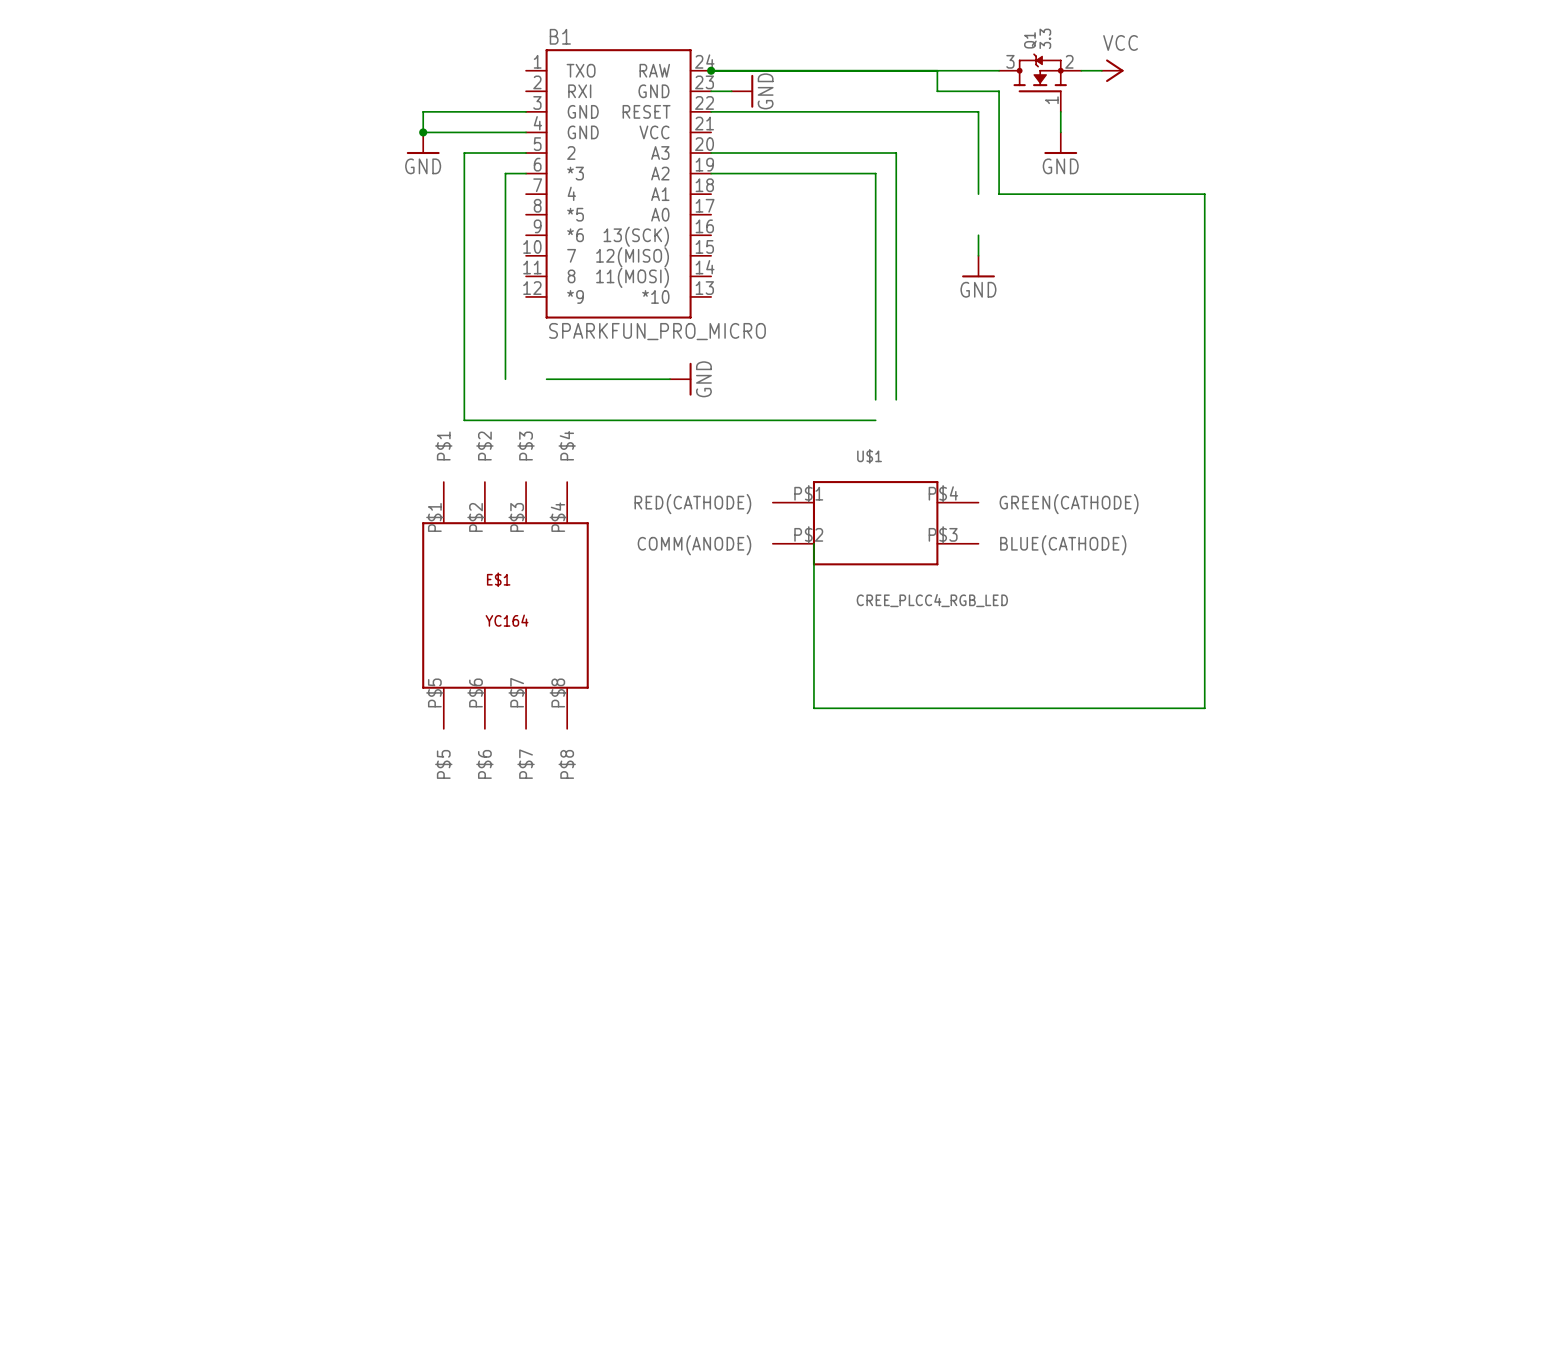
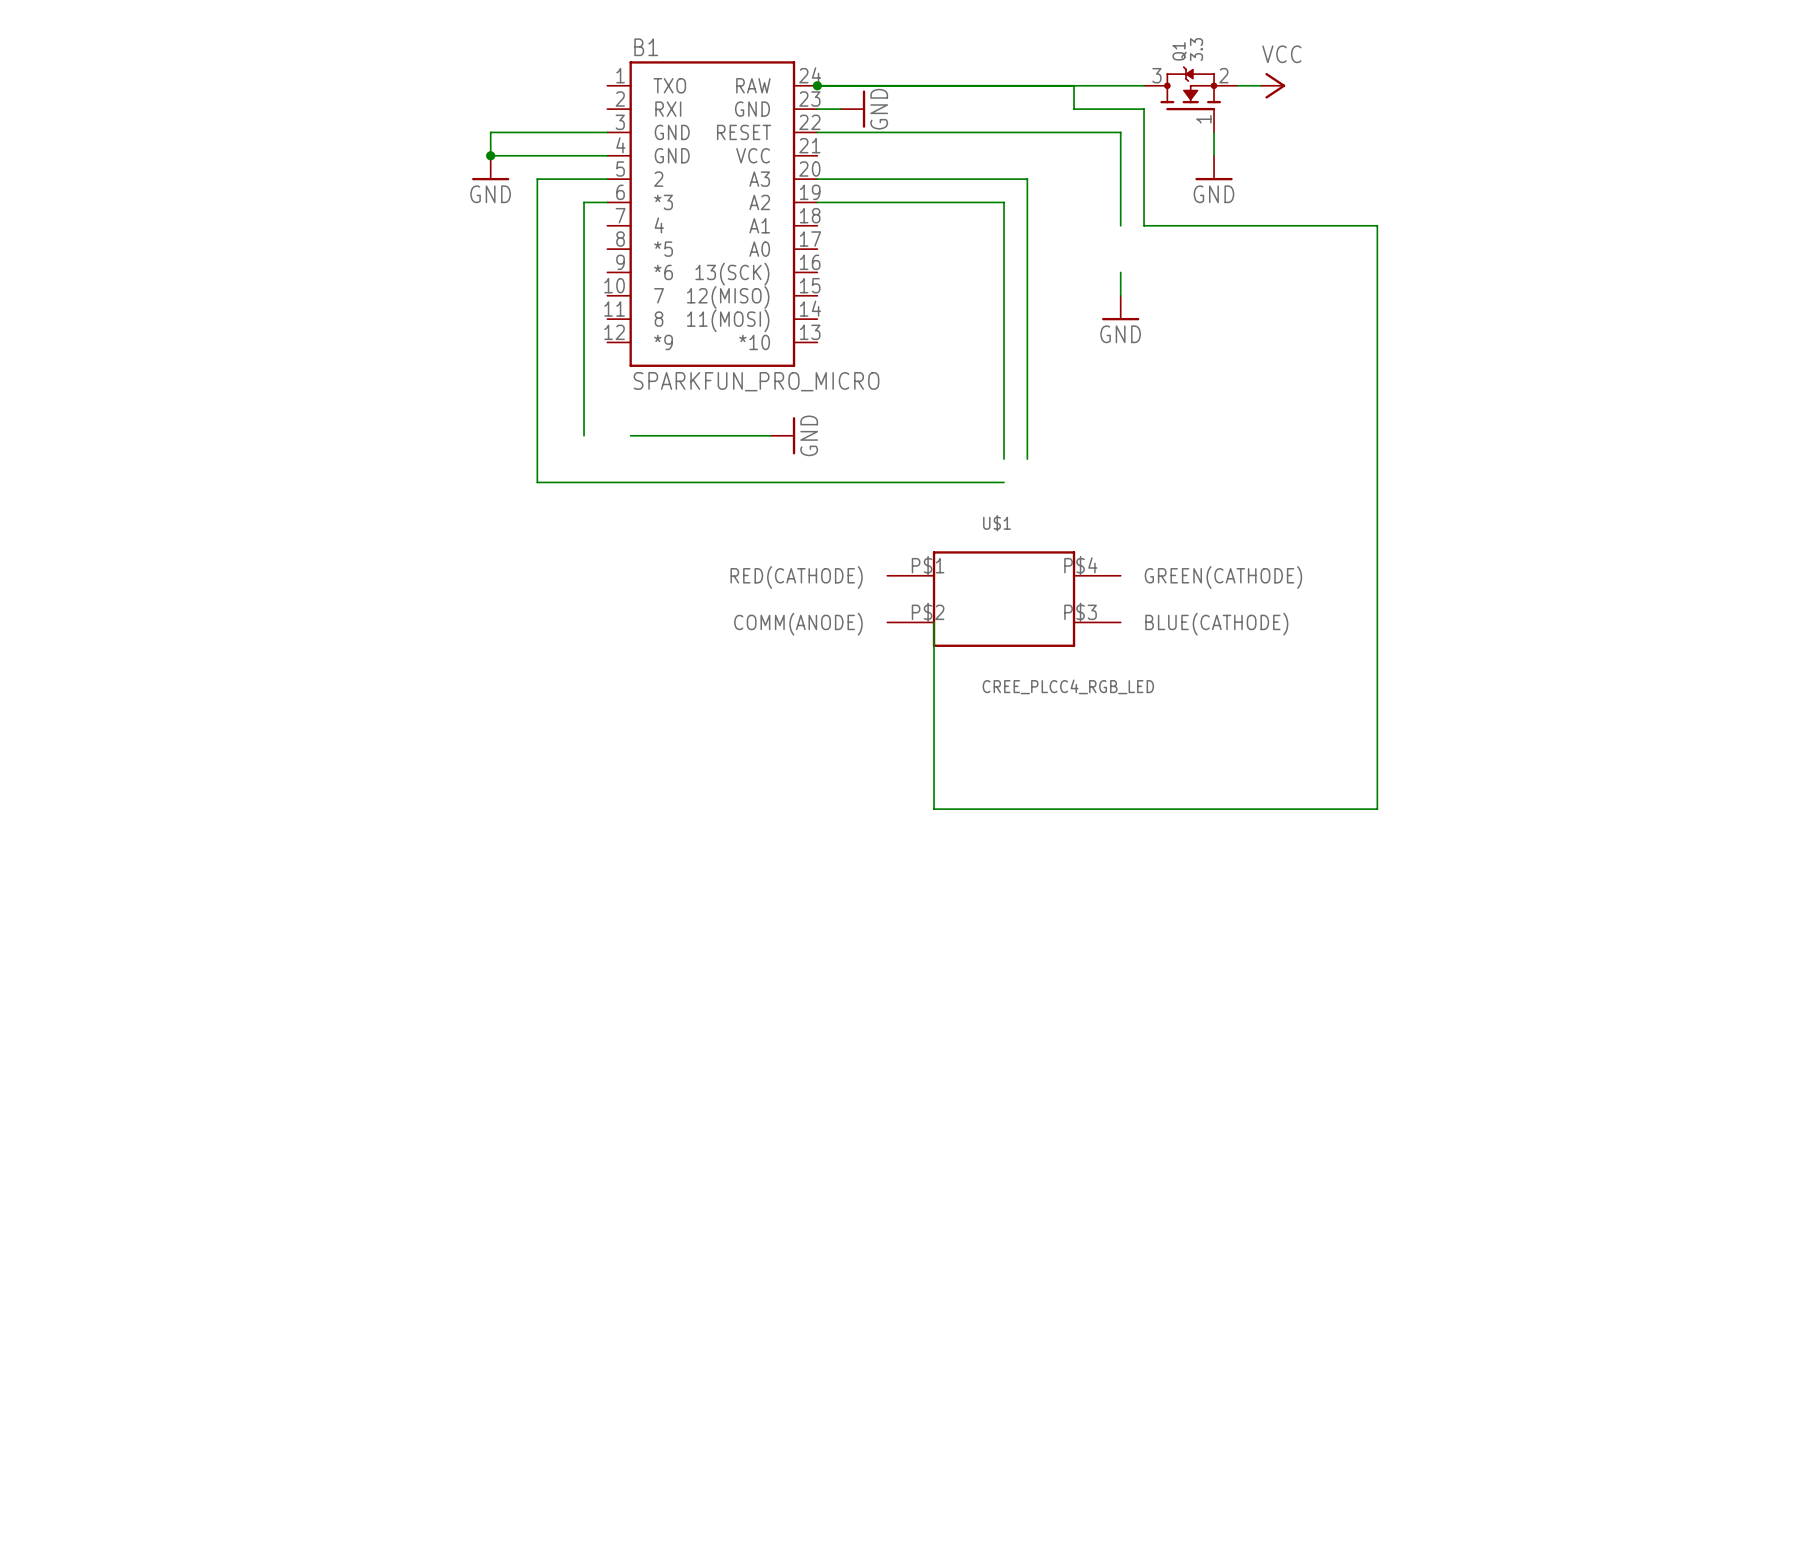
E$1: YC164 (505, 605) -> none

